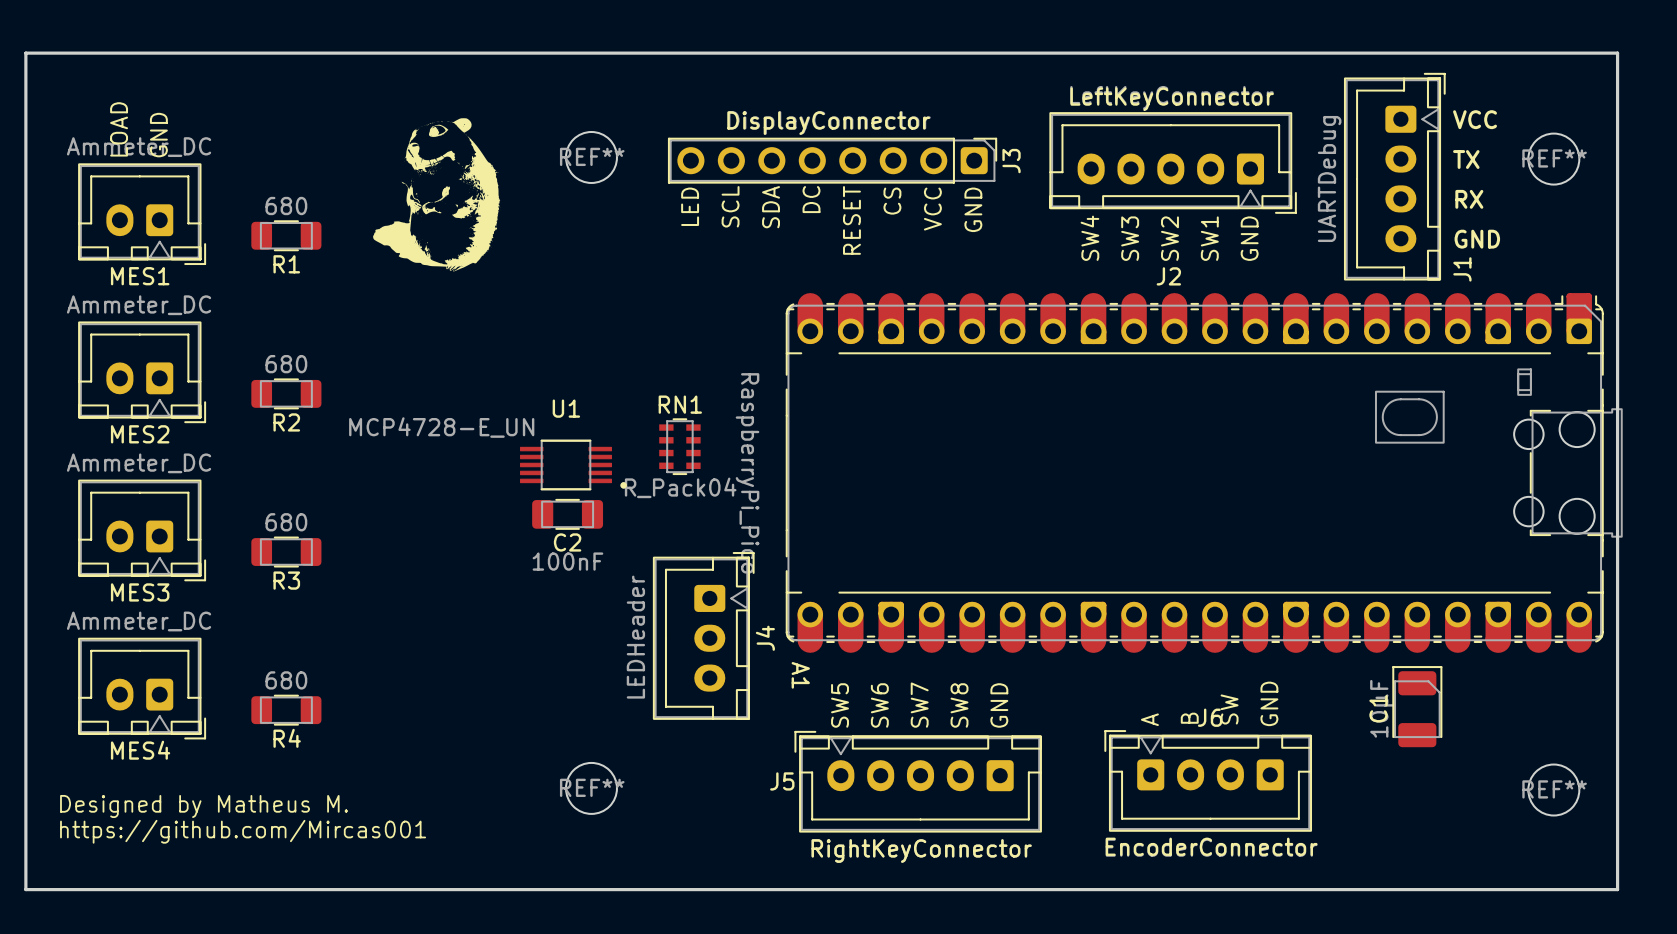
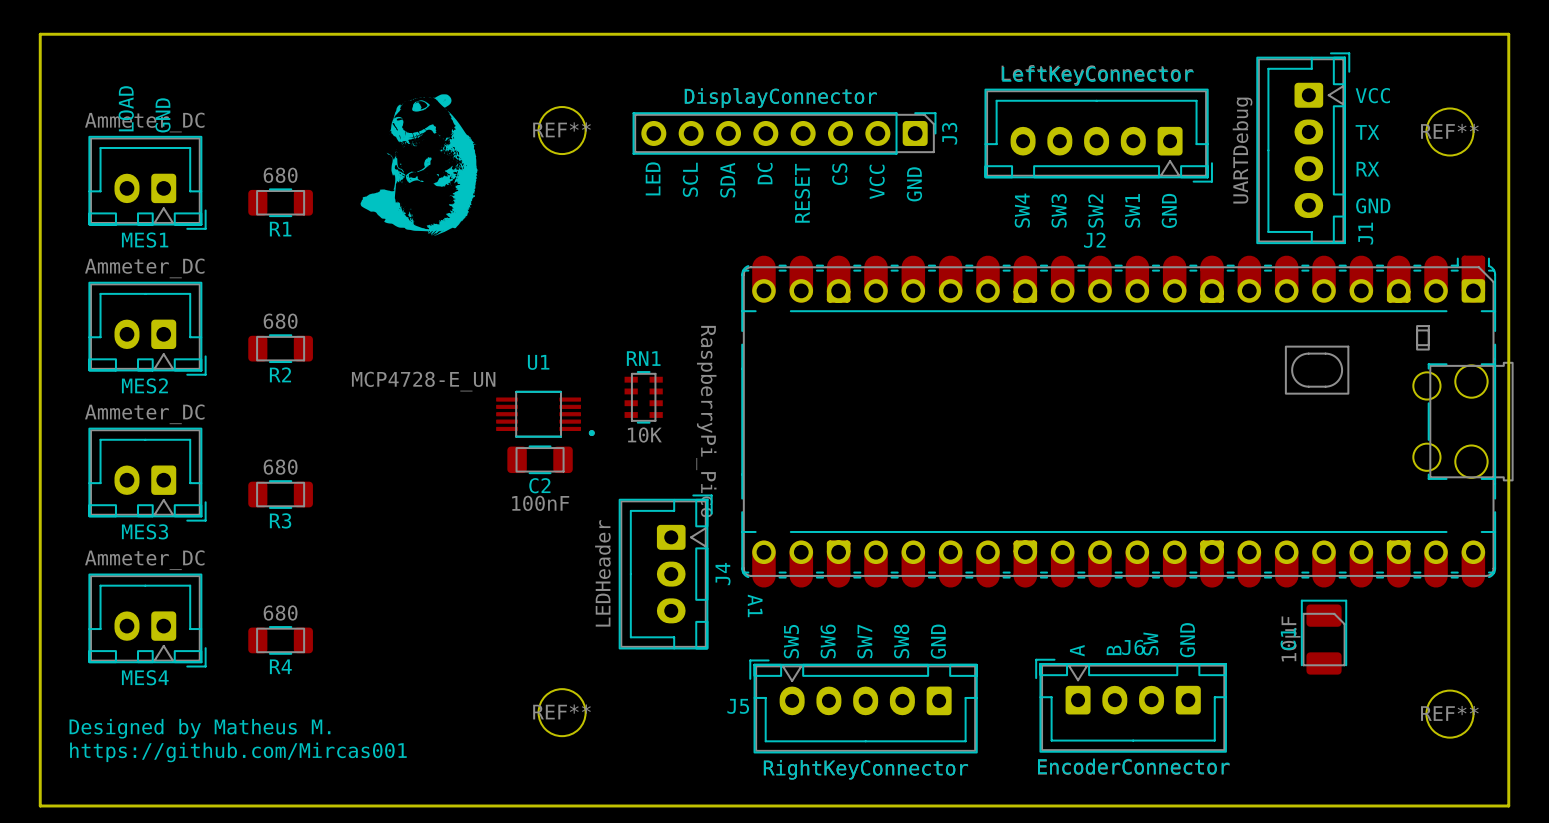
RN1 value: R_Pack04 (680, 487) -> 10K (644, 435)

